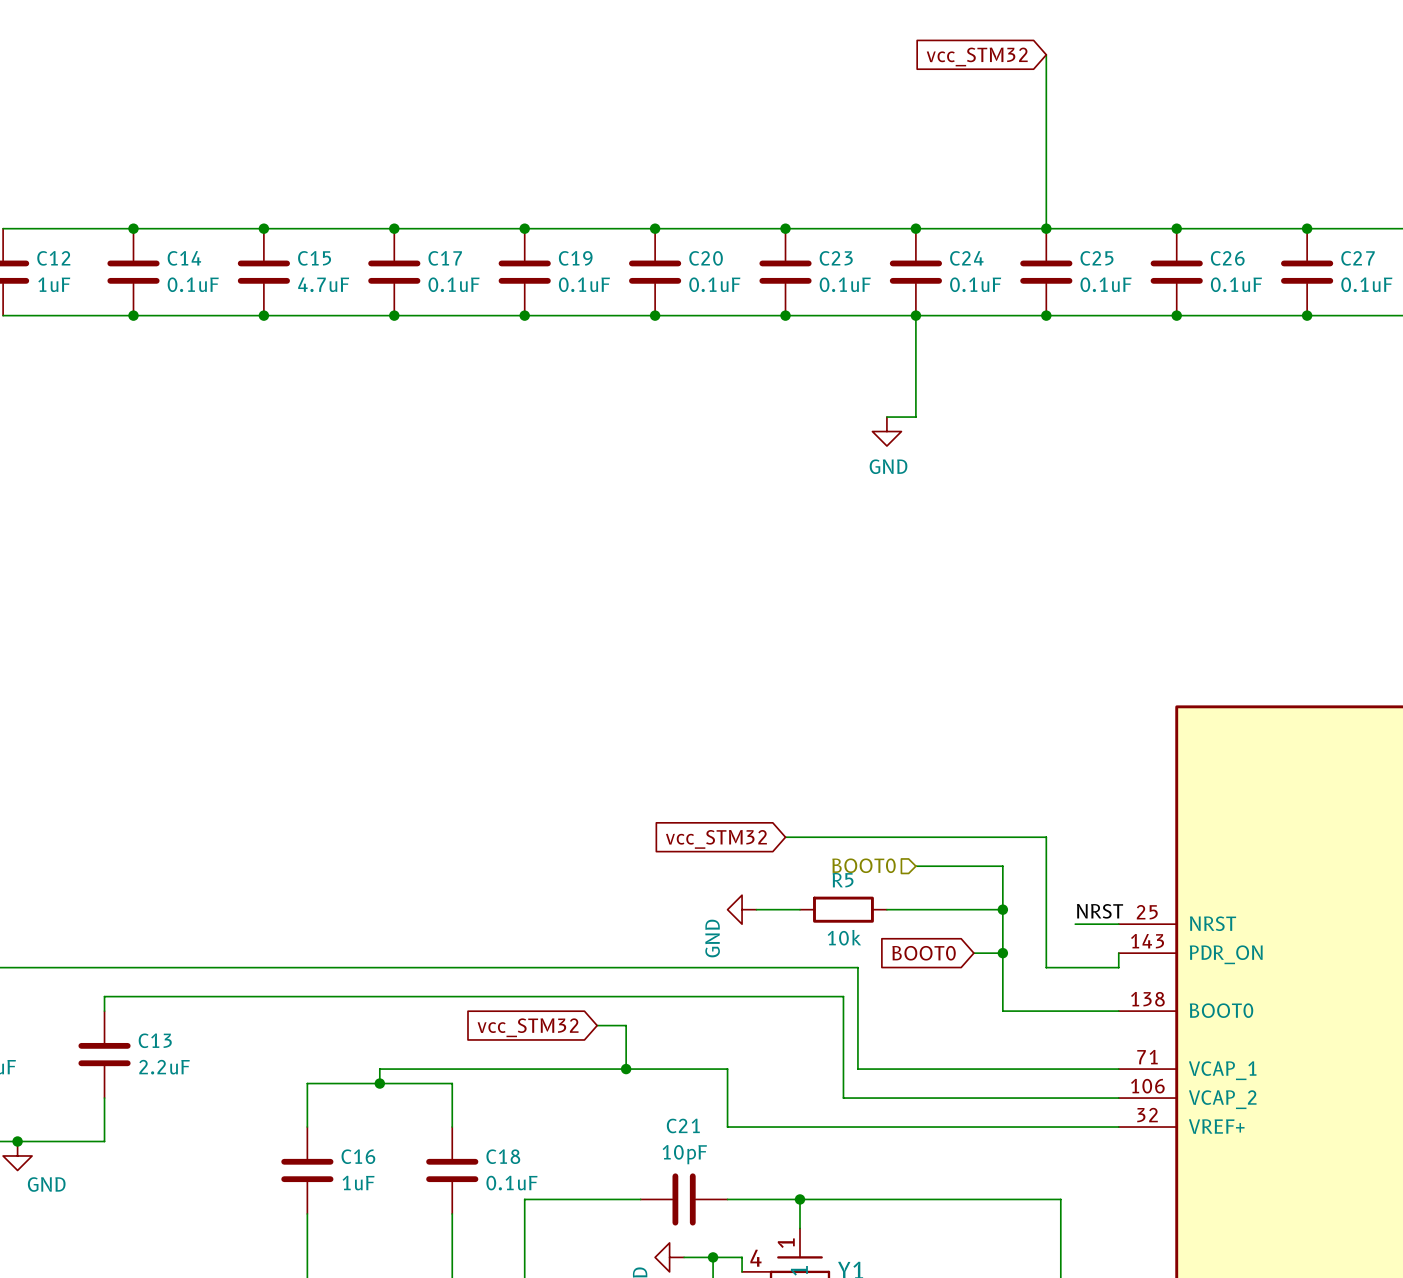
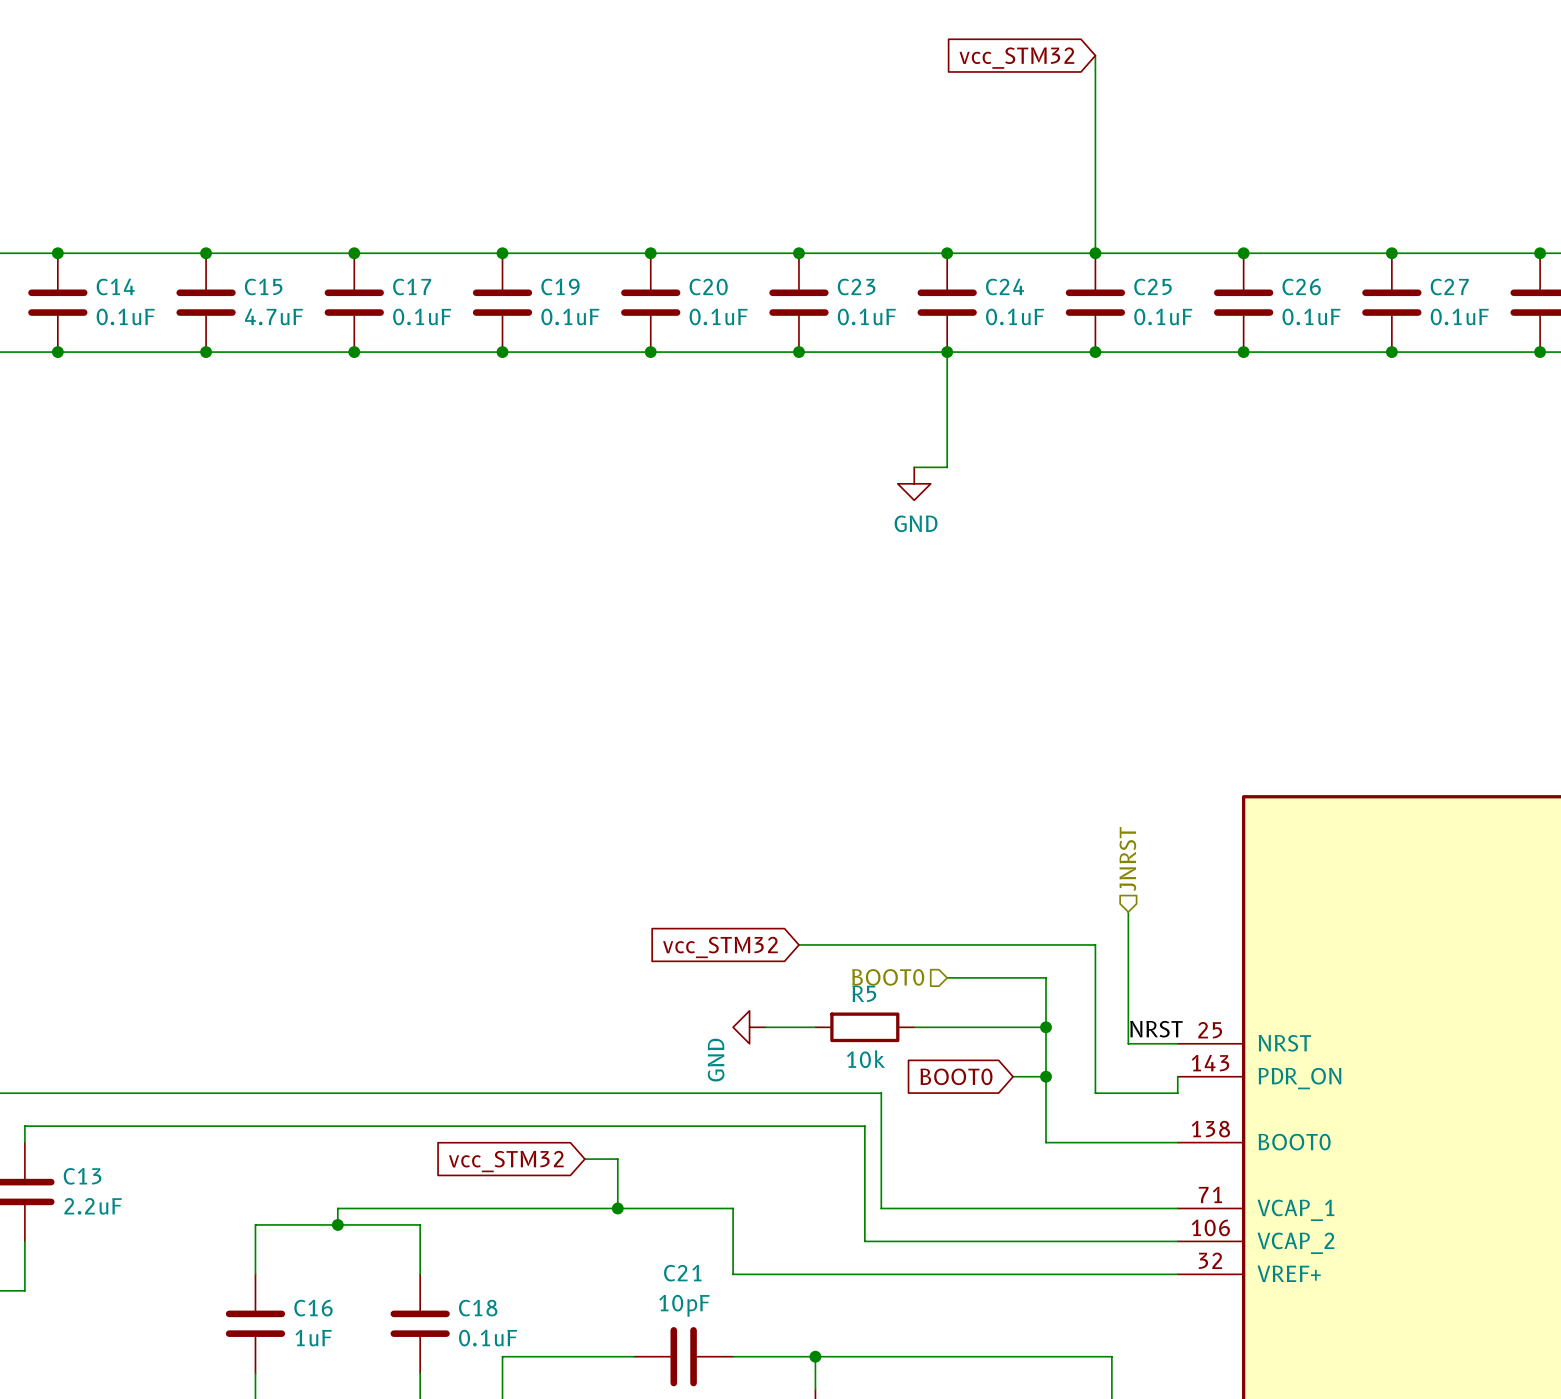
hierarchical label: none -> JNRST (1127, 859)
wire: none -> (1128, 912) (1128, 1043)

